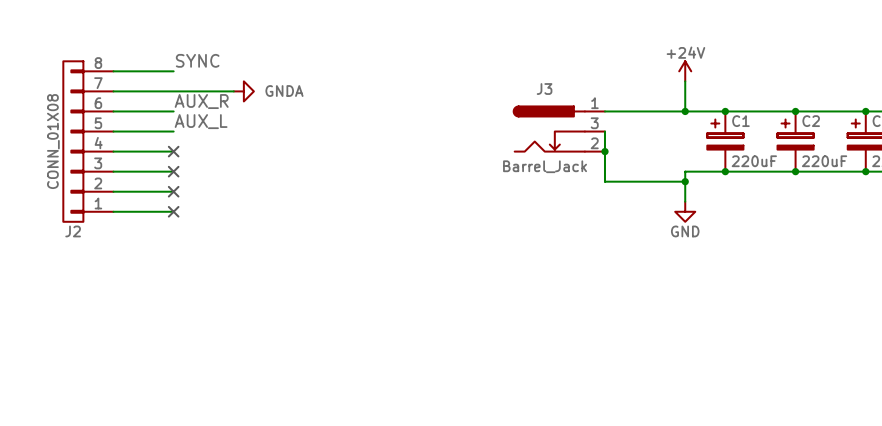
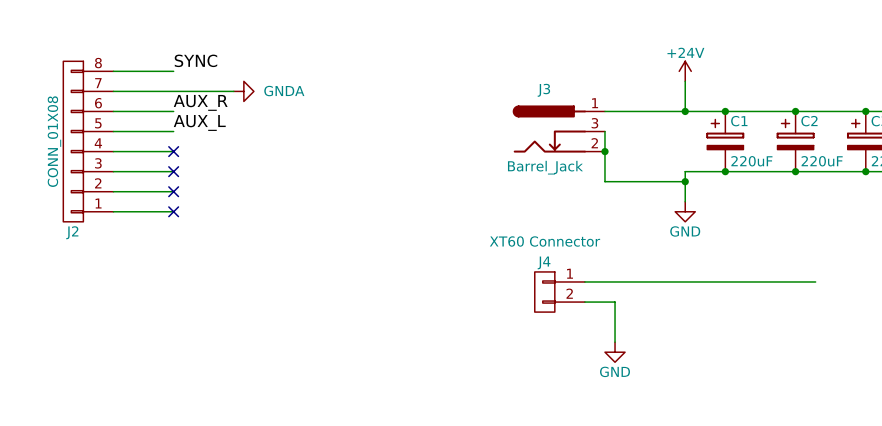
wire: none -> (584, 281) (815, 281)
J4: none -> XT60 Connector (559, 292)
wire: none -> (584, 302) (615, 302) (615, 342)
power symbol: none -> GND (615, 352)

